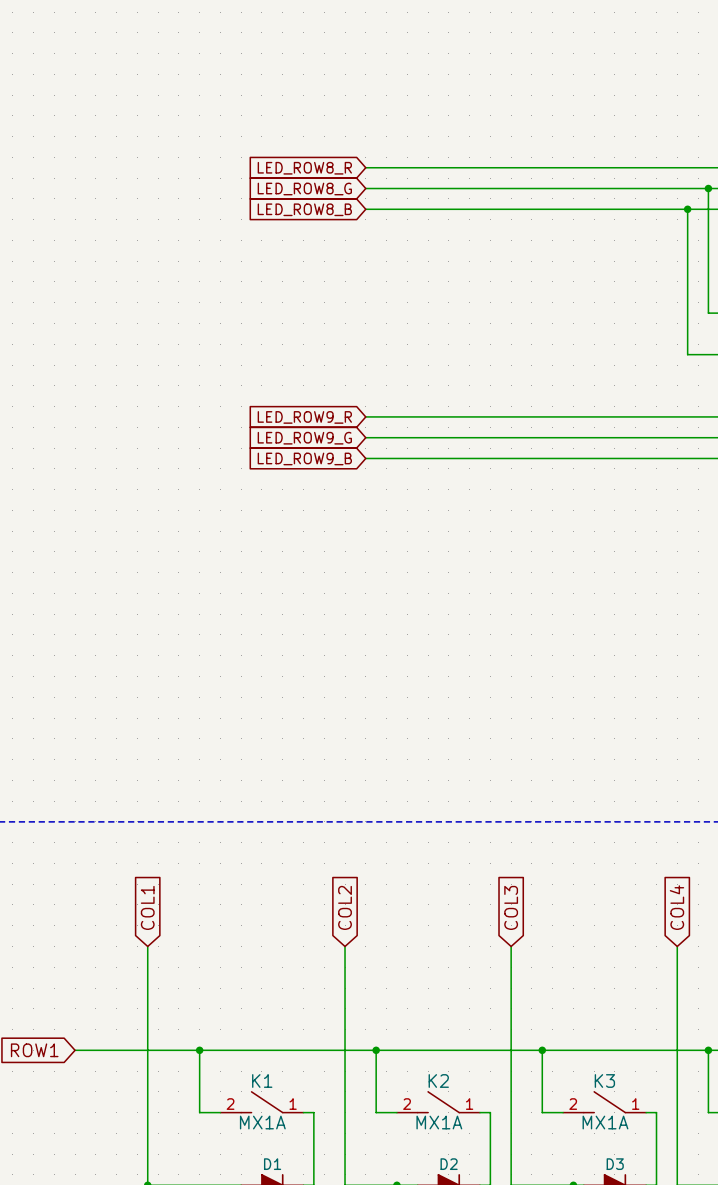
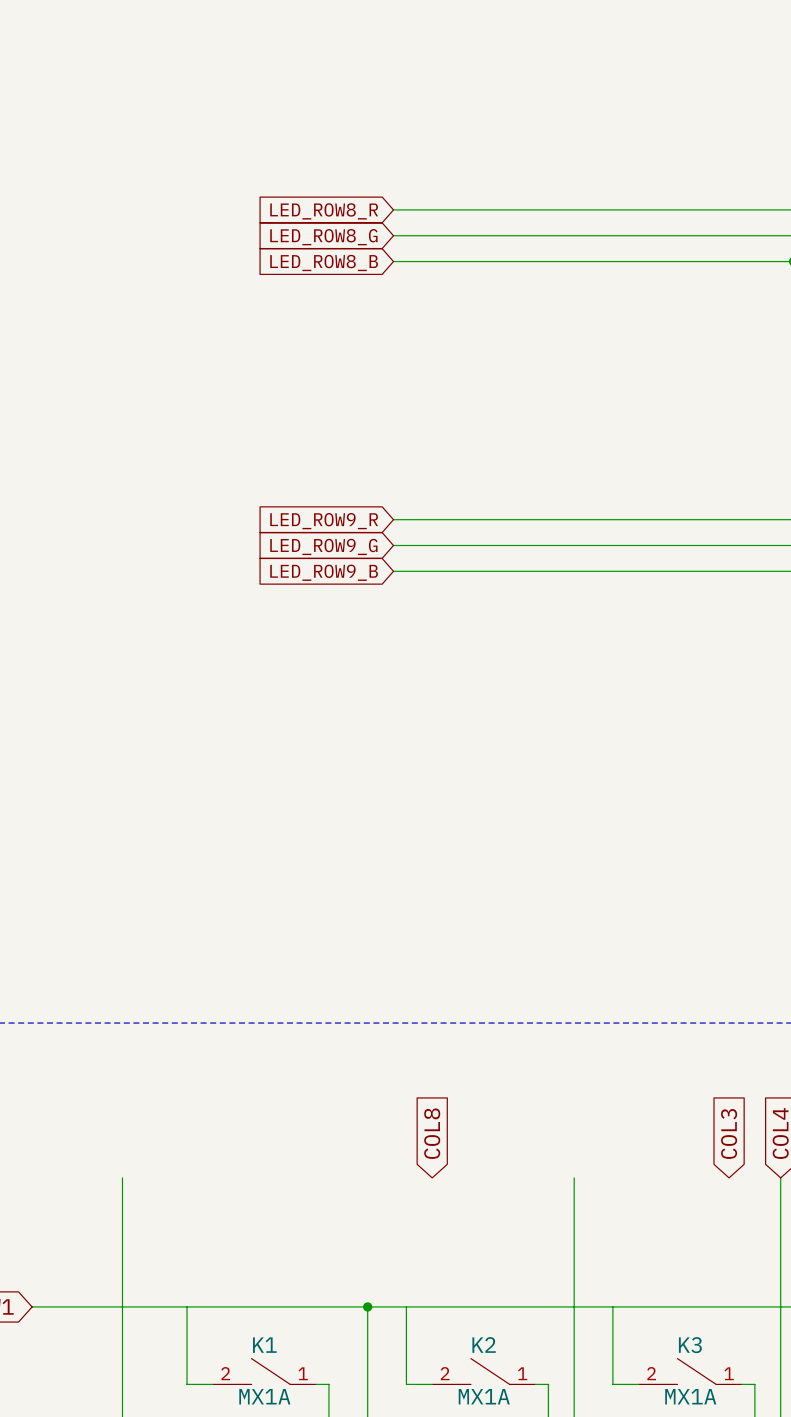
global label: COL1 (147, 907) -> none
global label: COL2 (345, 907) -> none
global label: none -> COL8 (432, 1133)
global label position: COL3 (511, 907) -> COL3 (729, 1133)
wire: (345, 946) (345, 1050) -> none
junction: (199, 1050) -> none
junction position: (376, 1050) -> (367, 1306)
junction: (542, 1050) -> none

